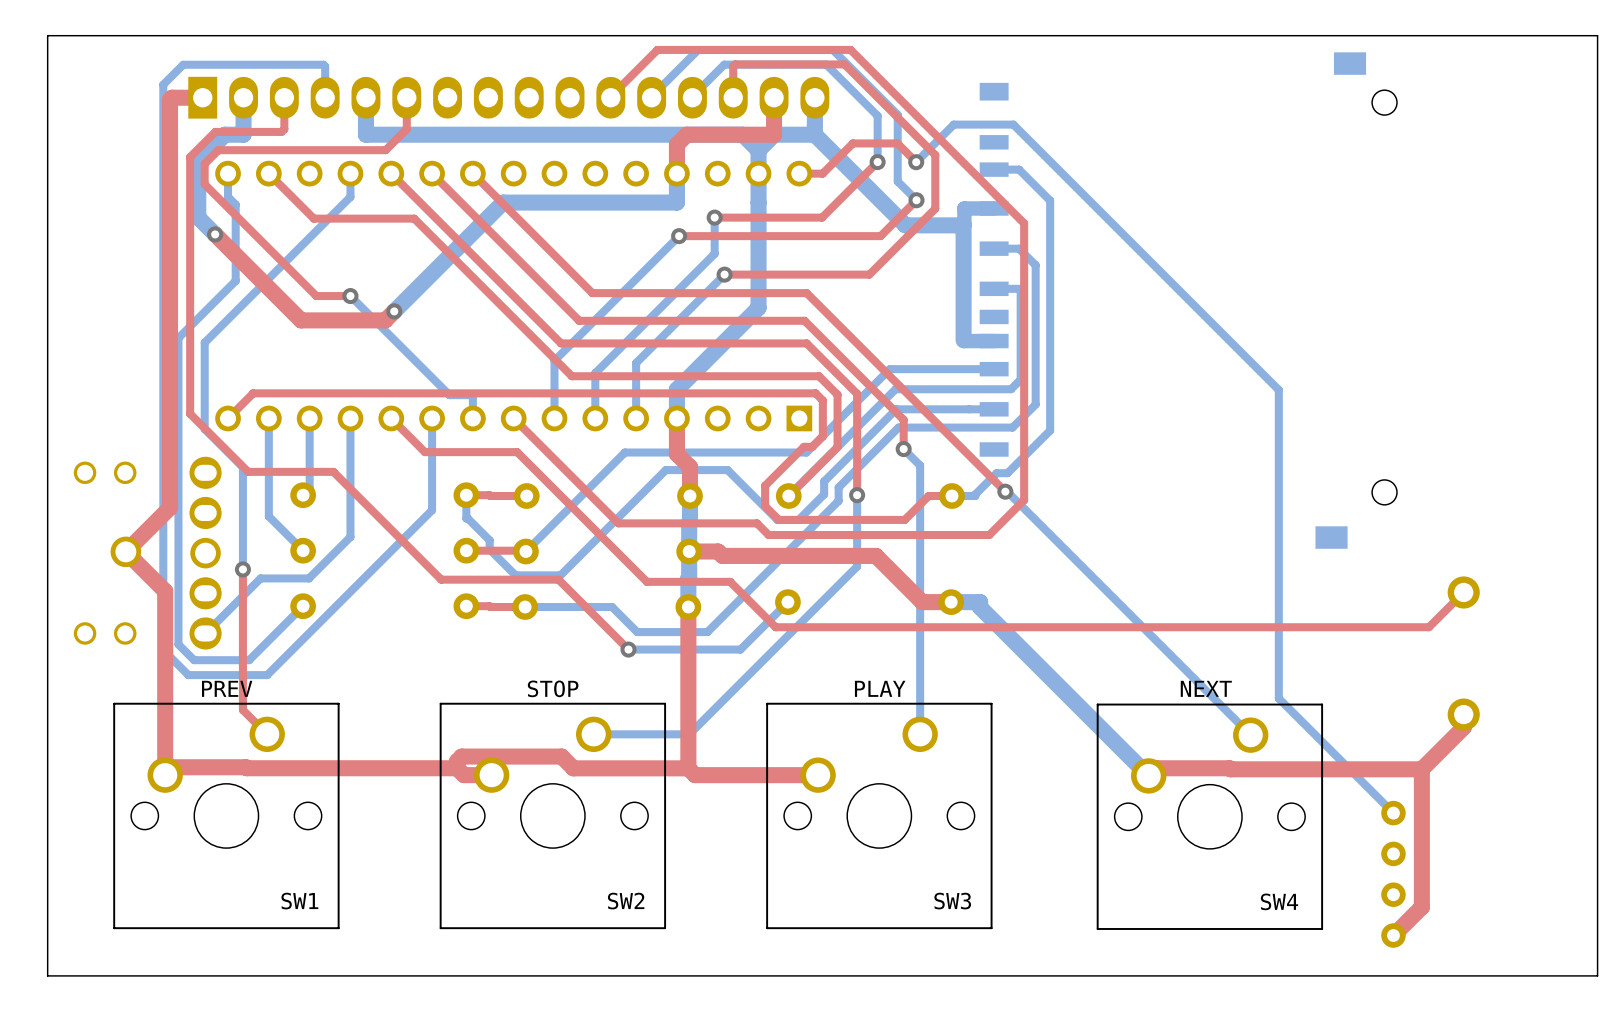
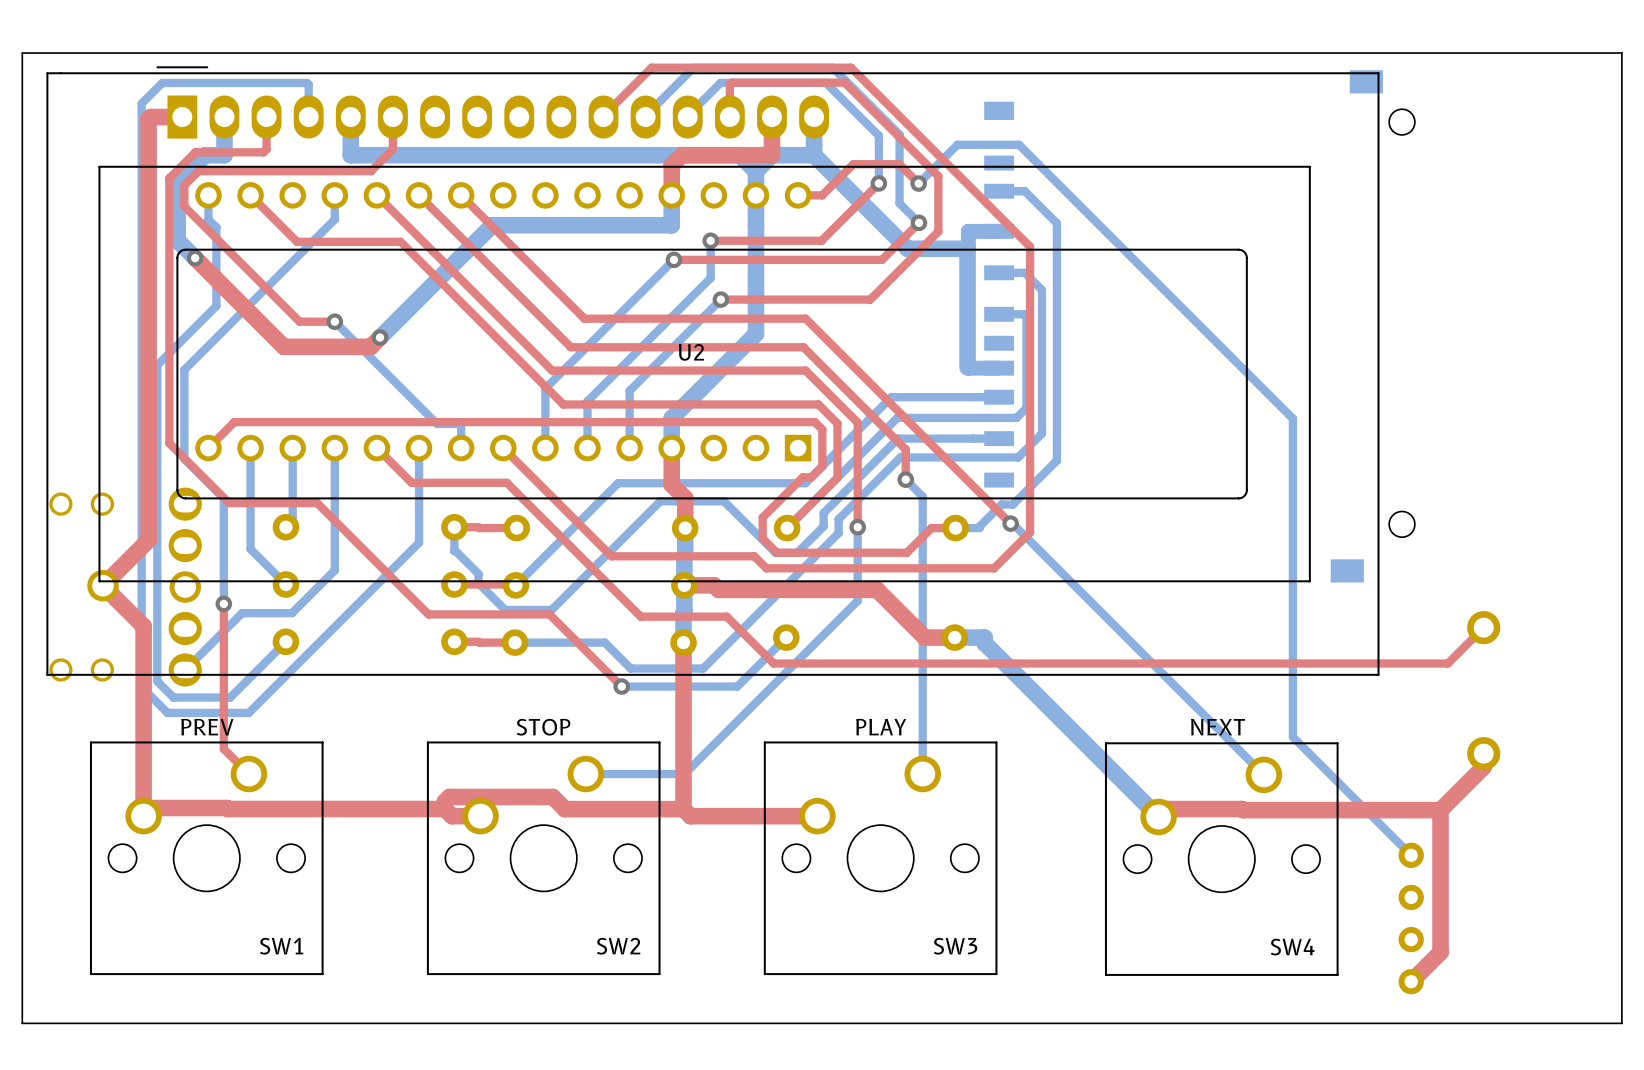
U2: none -> (712, 371)

